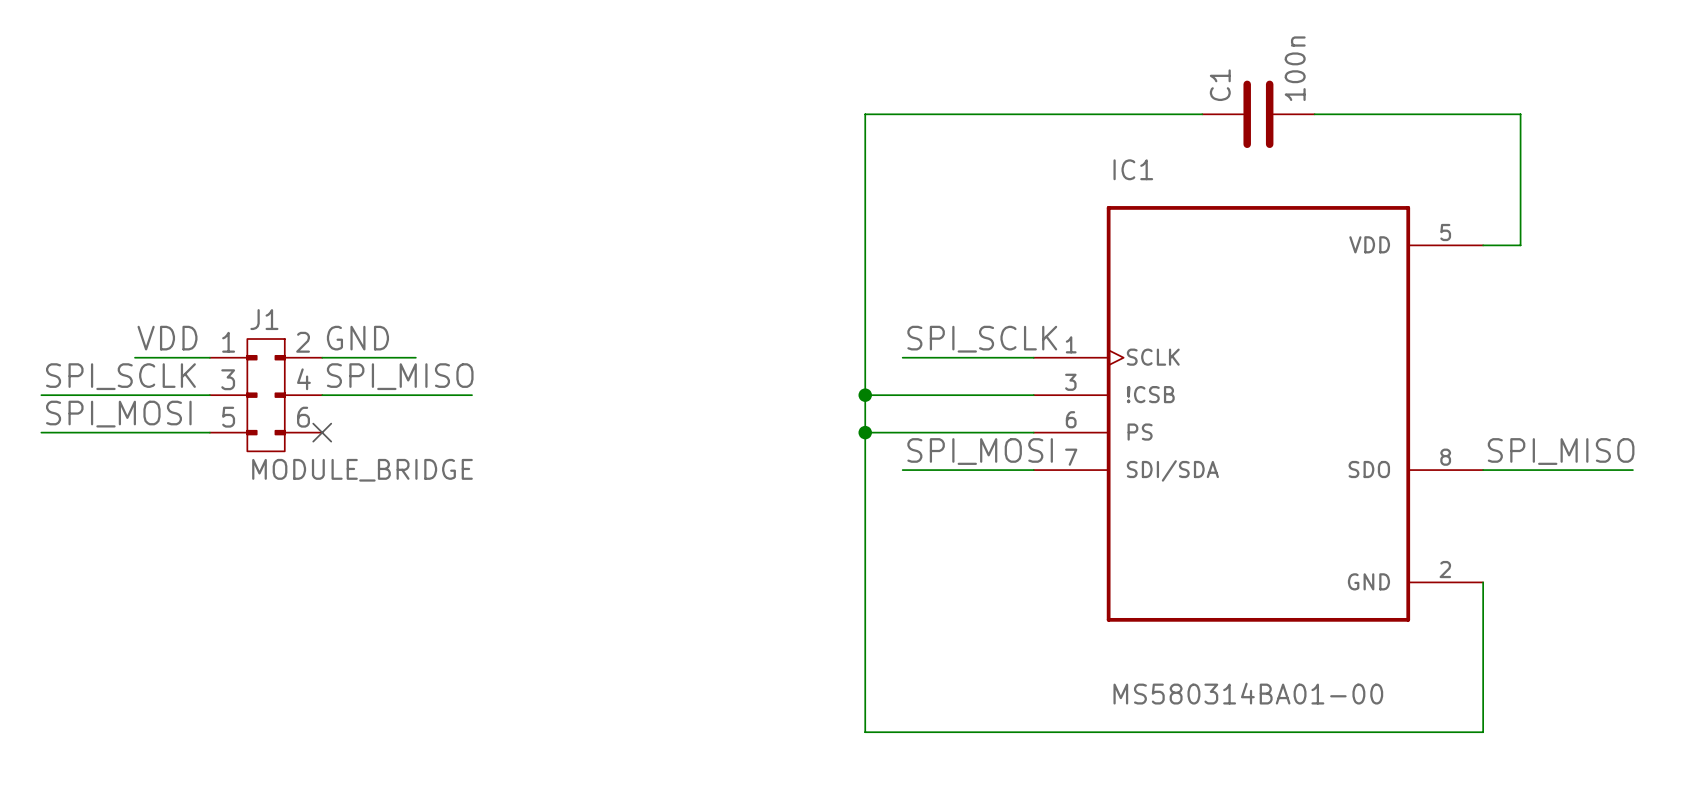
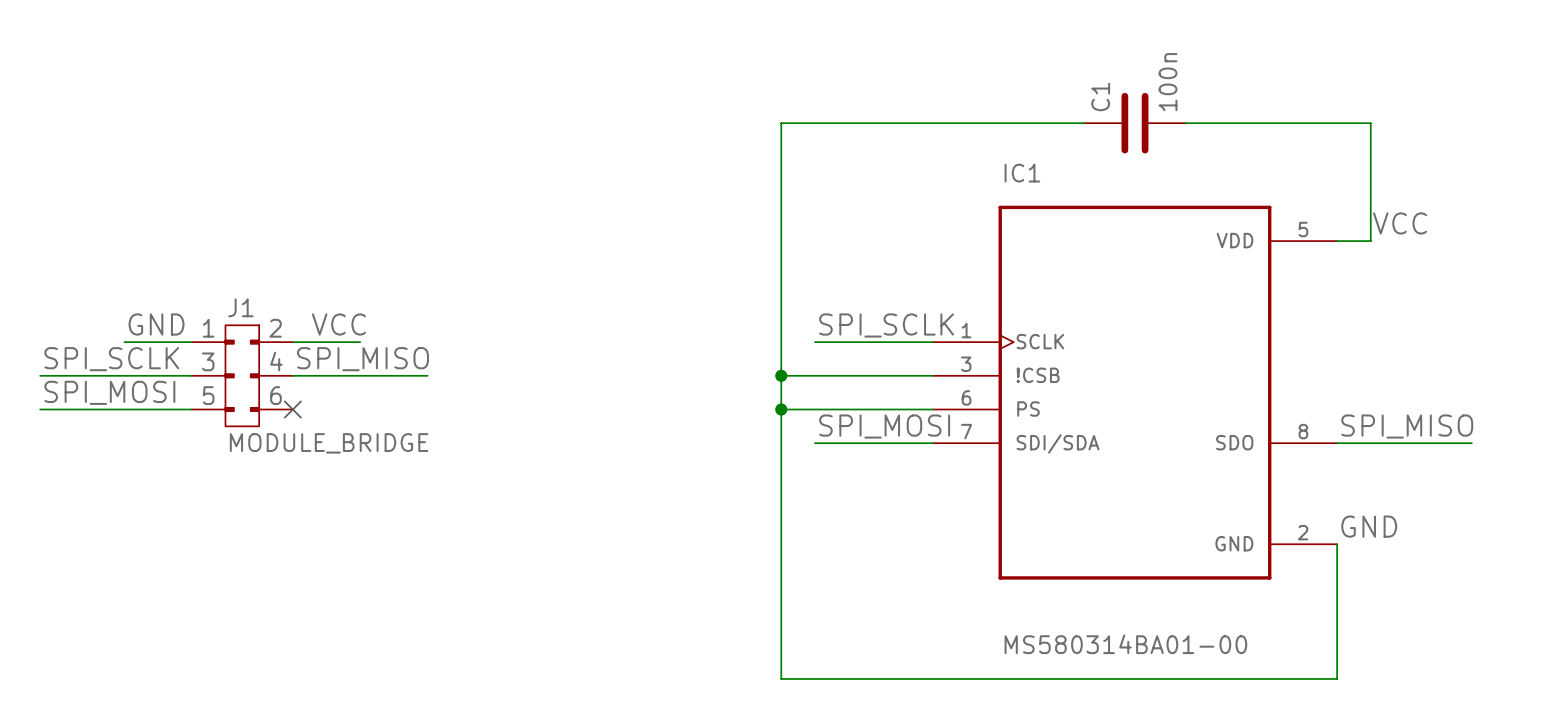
label: none -> VCC (1400, 223)
label: VDD (167, 338) -> GND (156, 324)
label: GND (357, 338) -> none
label: none -> VCC (338, 324)
wire: (397, 357) (415, 357) -> none
label: none -> GND (1369, 526)

